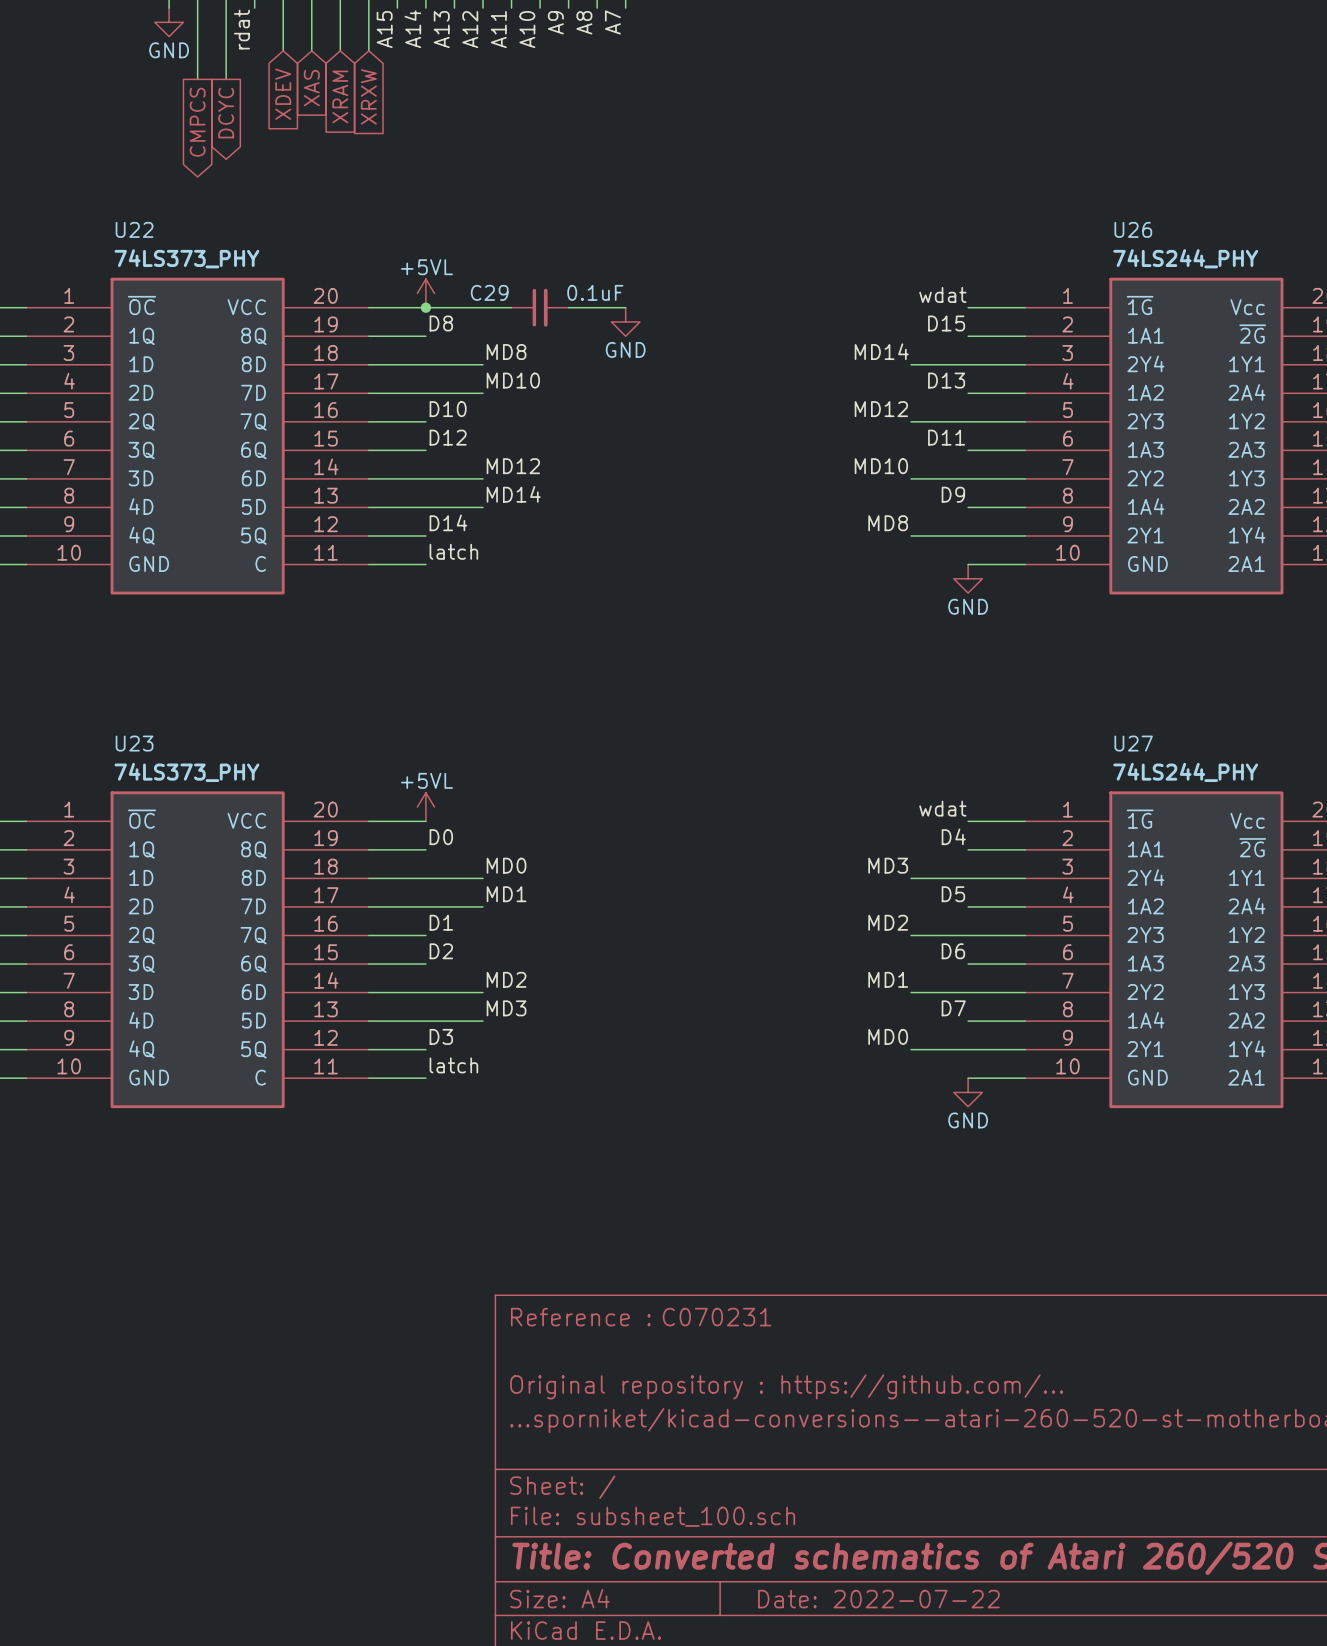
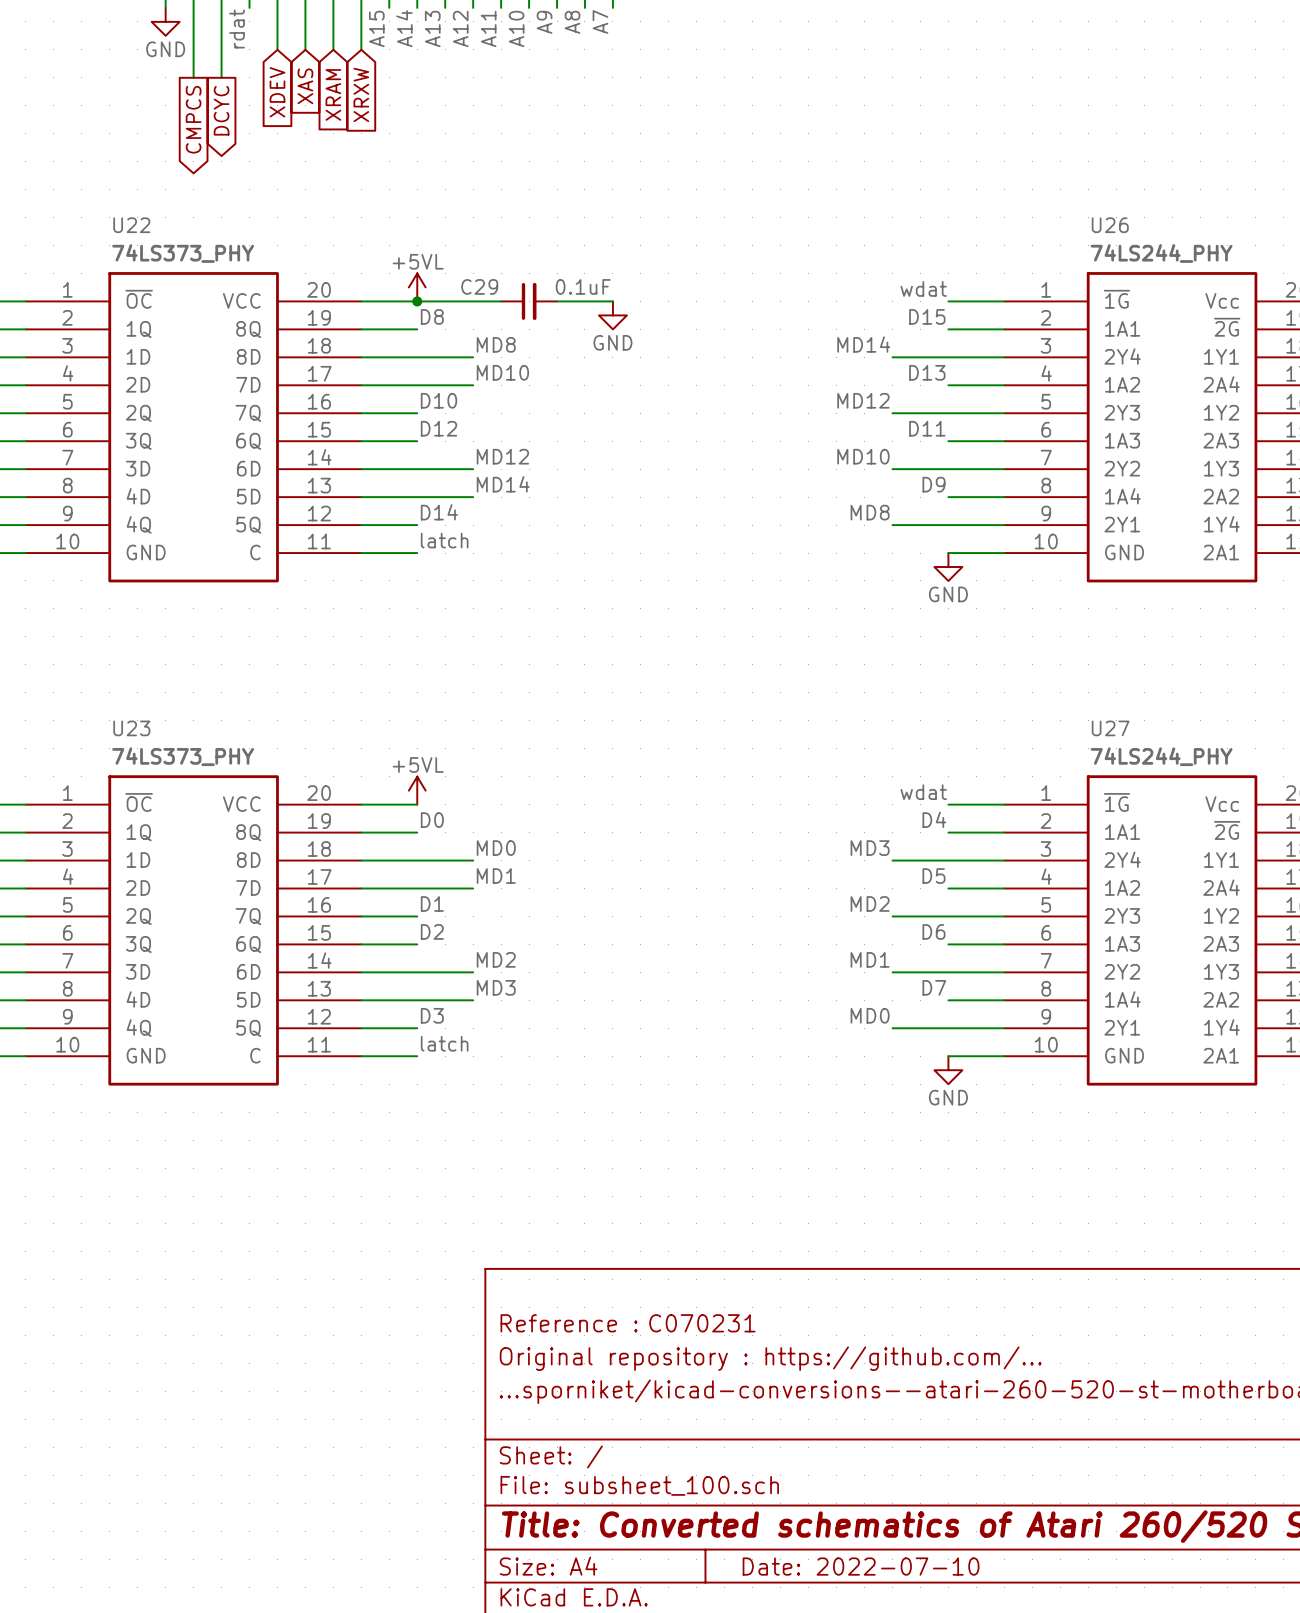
title block position: Reference : C070231 (641, 1317) -> Reference : C070231 (628, 1323)
title block: Date: 2022-07-22 (878, 1599) -> Date: 2022-07-10 (861, 1566)

